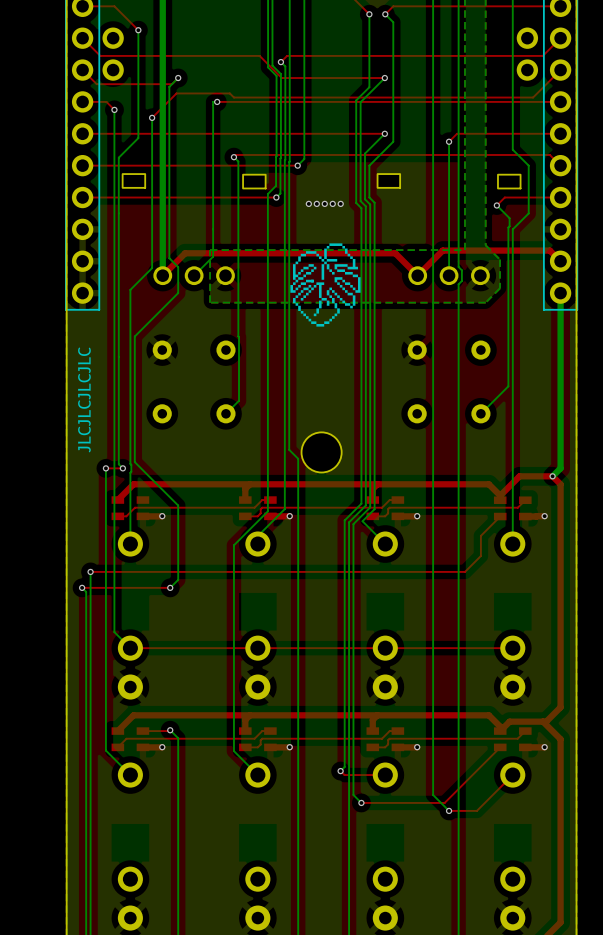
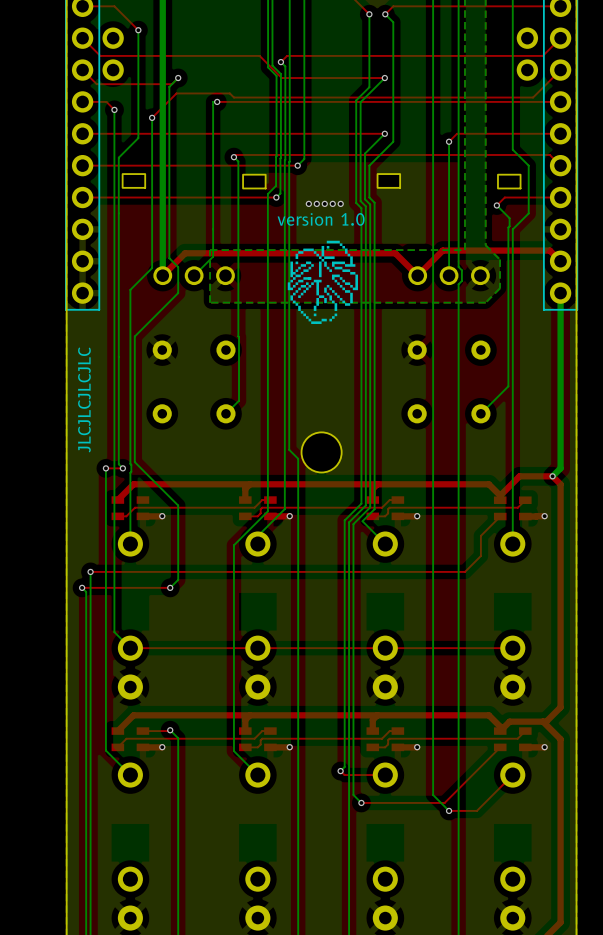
text: none -> version 1.0 (321, 219)
drawing: none -> [287, 240, 358, 324]
drawing: [290, 243, 361, 327] -> none

